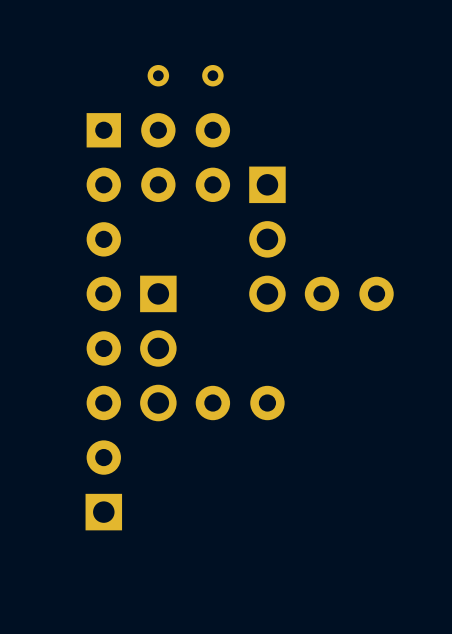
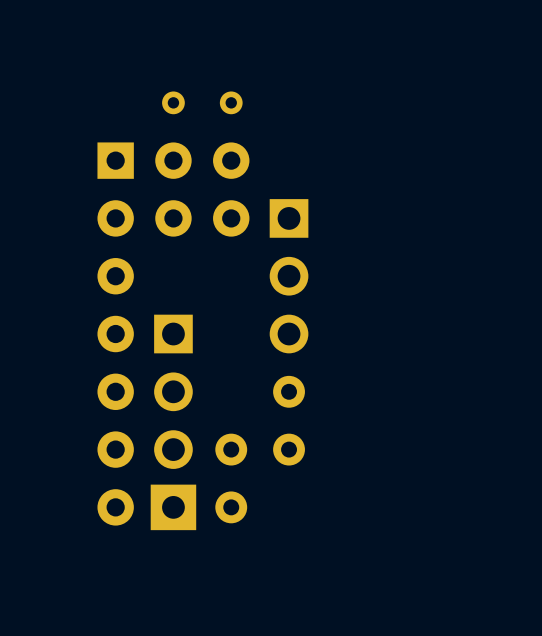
part: (349, 293) -> none
part: none -> (289, 420)
part: (240, 403) -> none
part: none -> (231, 478)
part: none -> (173, 507)
part: (103, 512) -> none

